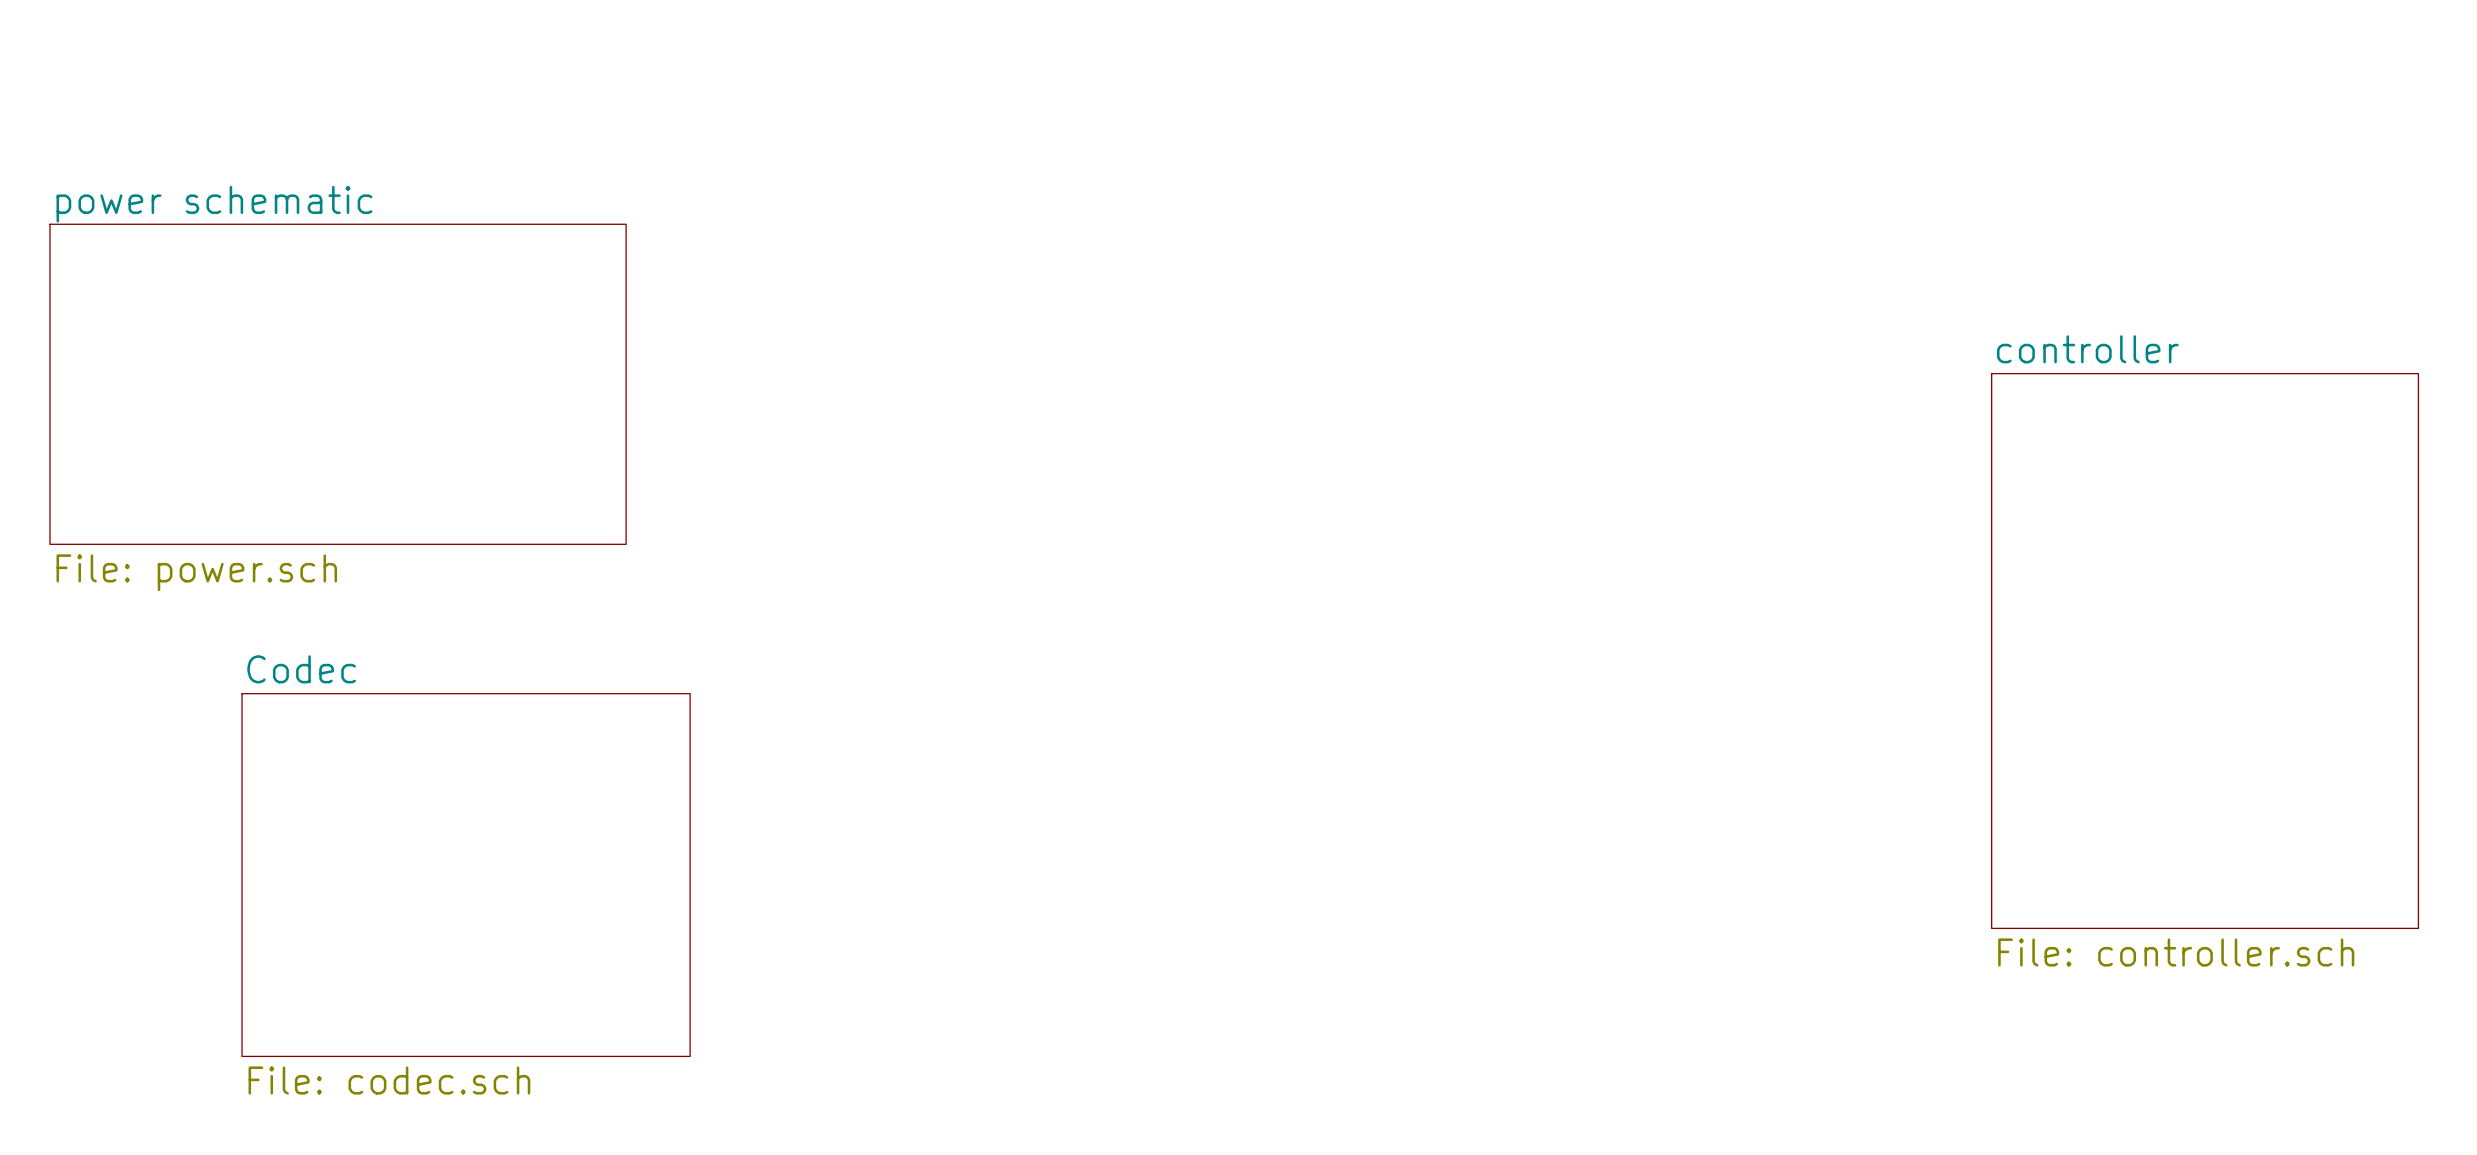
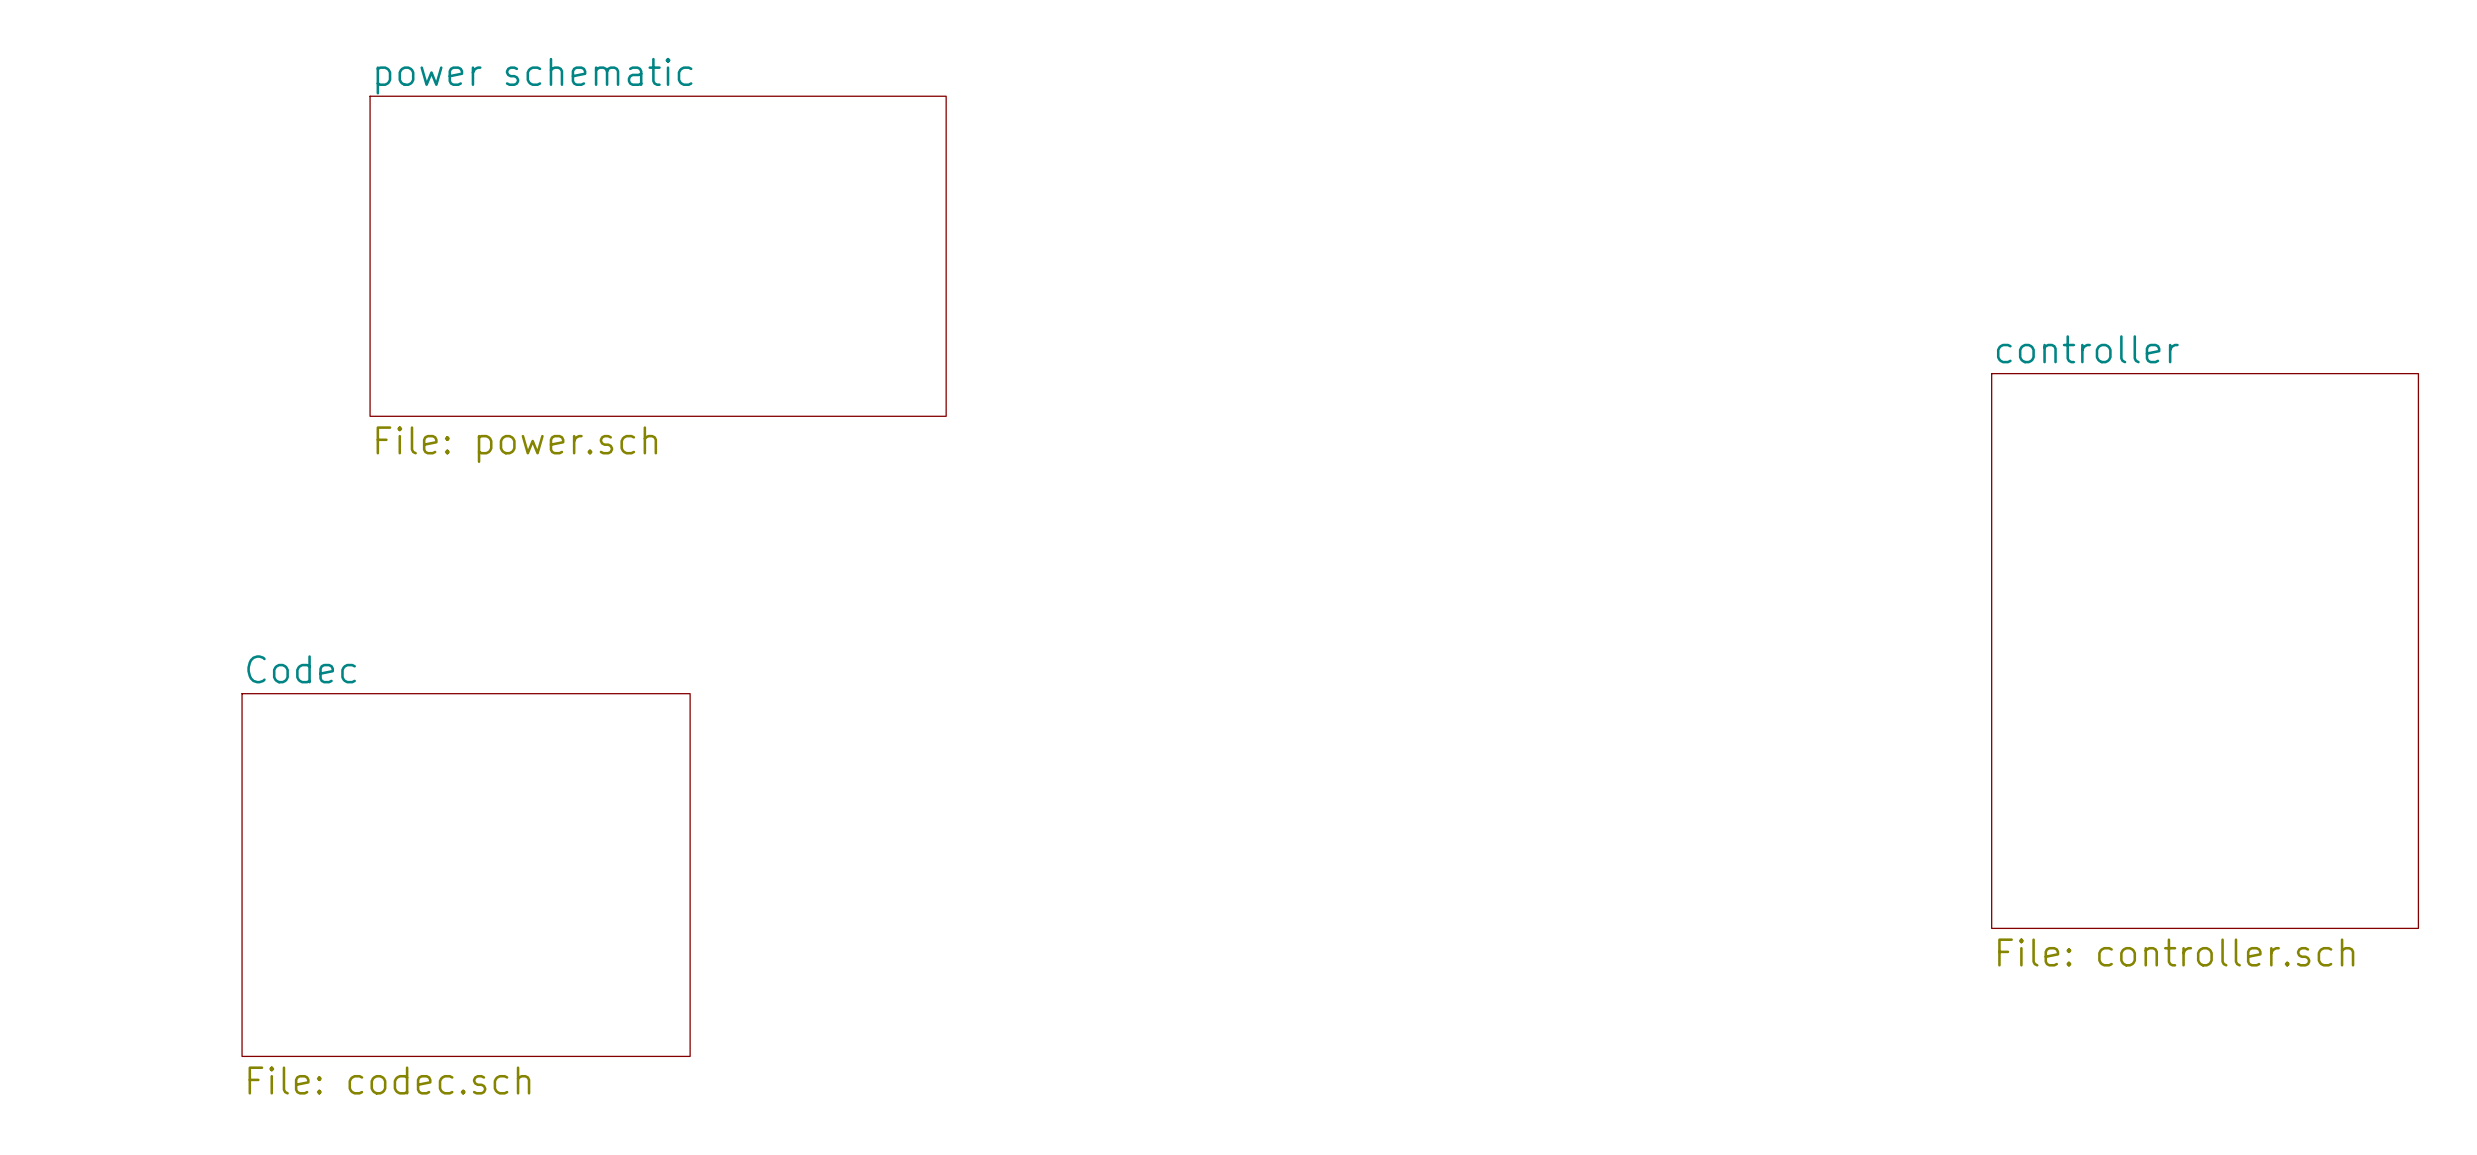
sheet power schematic position: (338, 384) -> (658, 256)

